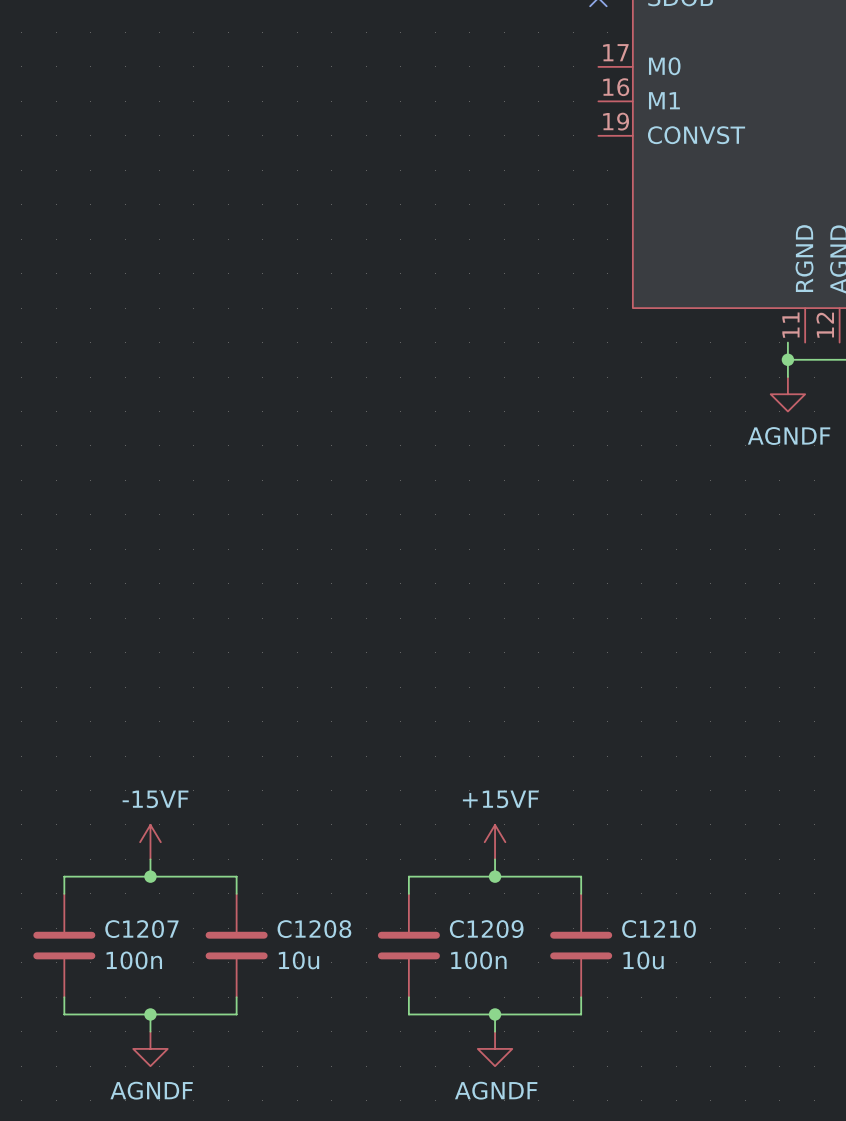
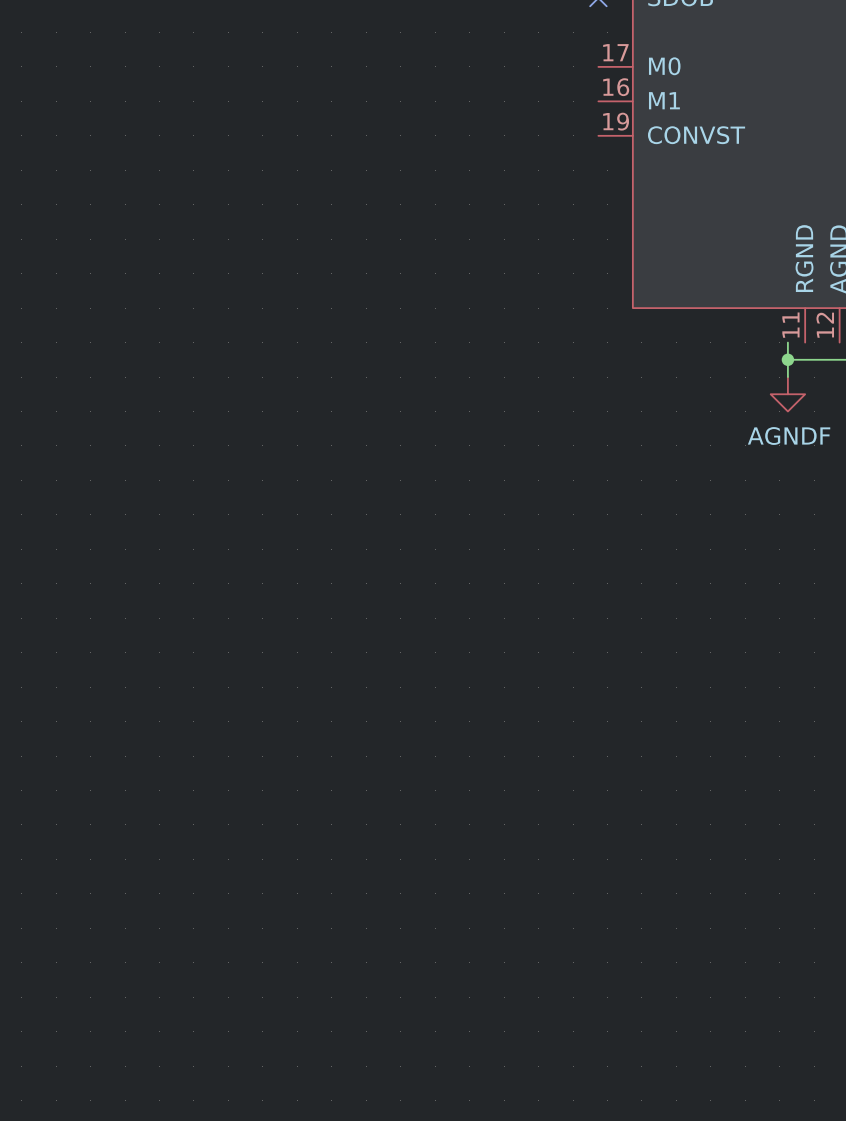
power symbol: -15VF (150, 842) -> none
power symbol: +15VF (495, 842) -> none
wire: (150, 859) (150, 876) -> none
wire: (495, 859) (495, 876) -> none
junction: (150, 876) -> none
junction: (495, 876) -> none
wire: (64, 893) (64, 876) (236, 876) (236, 893) -> none
wire: (408, 893) (408, 876) (581, 876) (581, 893) -> none
C1207: 100n (64, 945) -> none
C1208: 10u (236, 945) -> none
C1209: 100n (408, 945) -> none
C1210: 10u (581, 945) -> none
wire: (64, 997) (64, 1014) (236, 1014) (236, 997) -> none
wire: (408, 997) (408, 1014) (581, 1014) (581, 997) -> none
wire: (150, 1014) (150, 1031) -> none
junction: (150, 1014) -> none
wire: (495, 1014) (495, 1031) -> none
junction: (495, 1014) -> none
power symbol: AGNDF (150, 1048) -> none
power symbol: AGNDF (495, 1048) -> none

